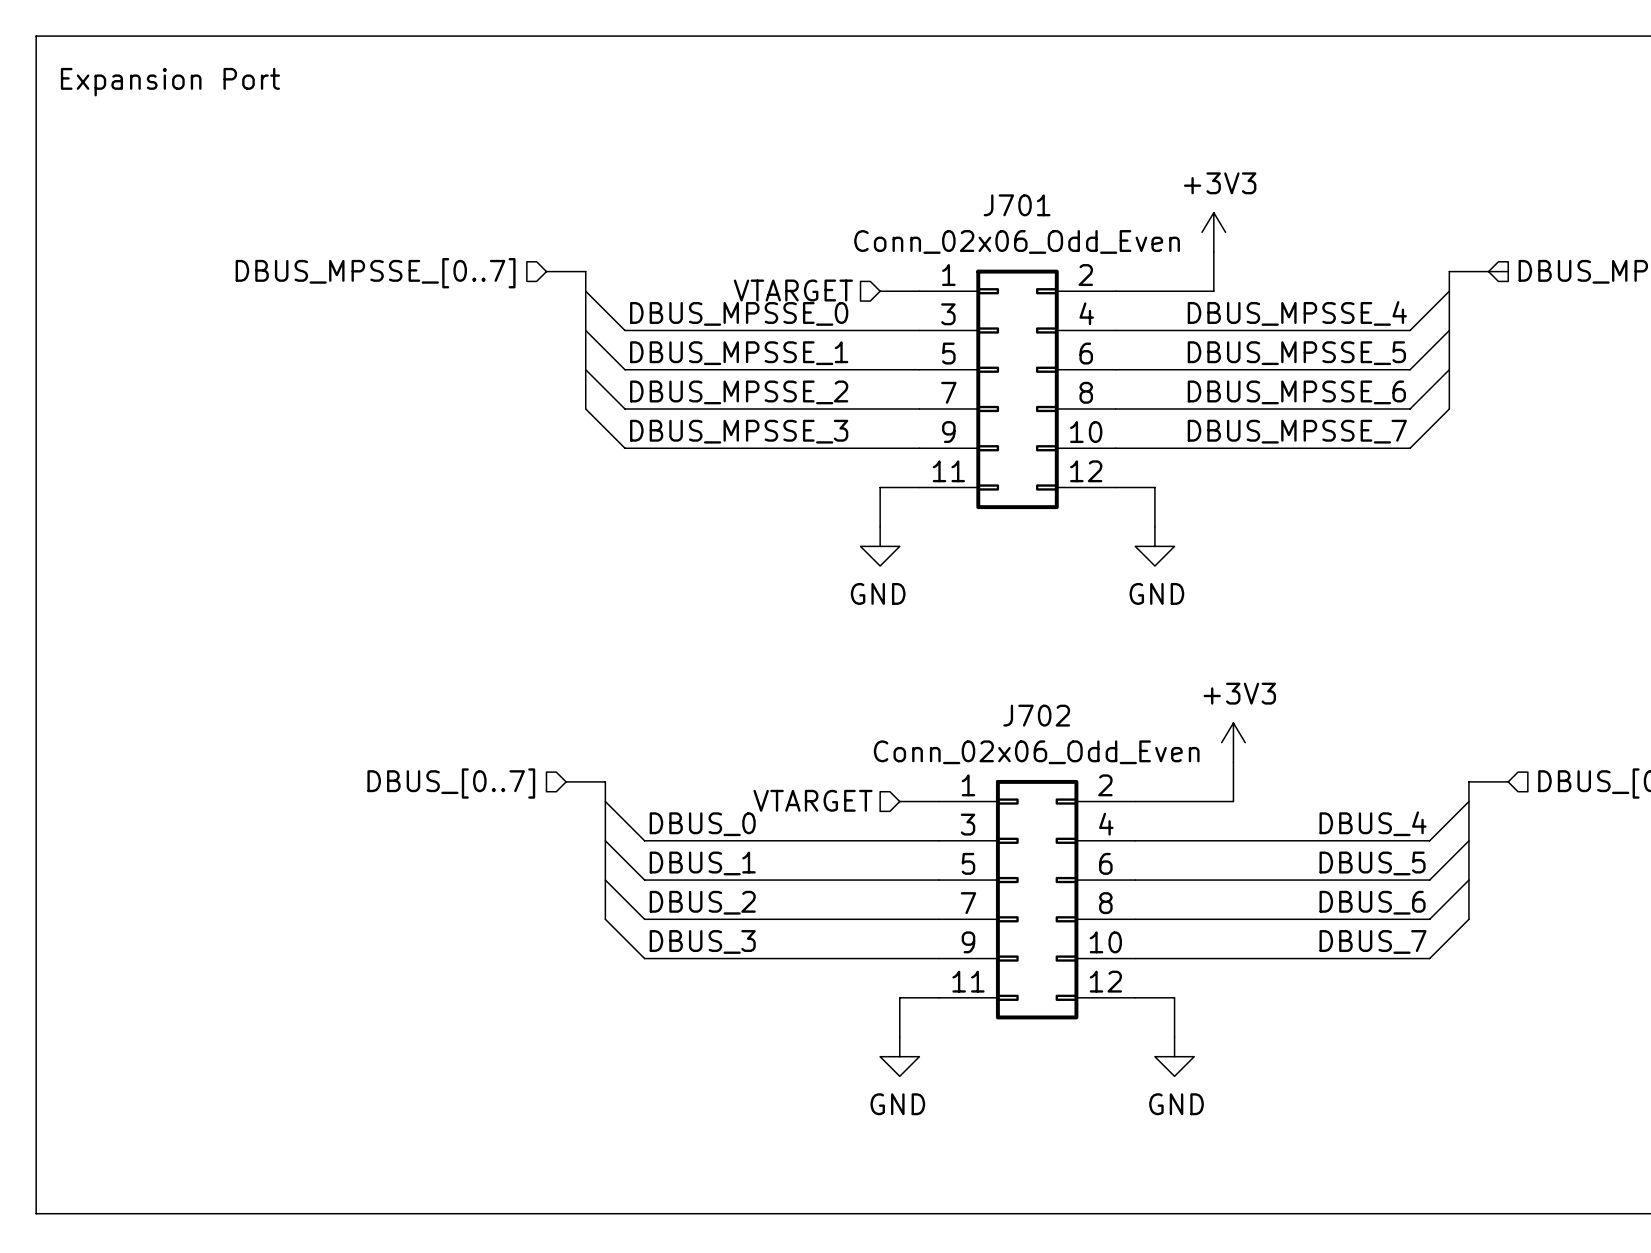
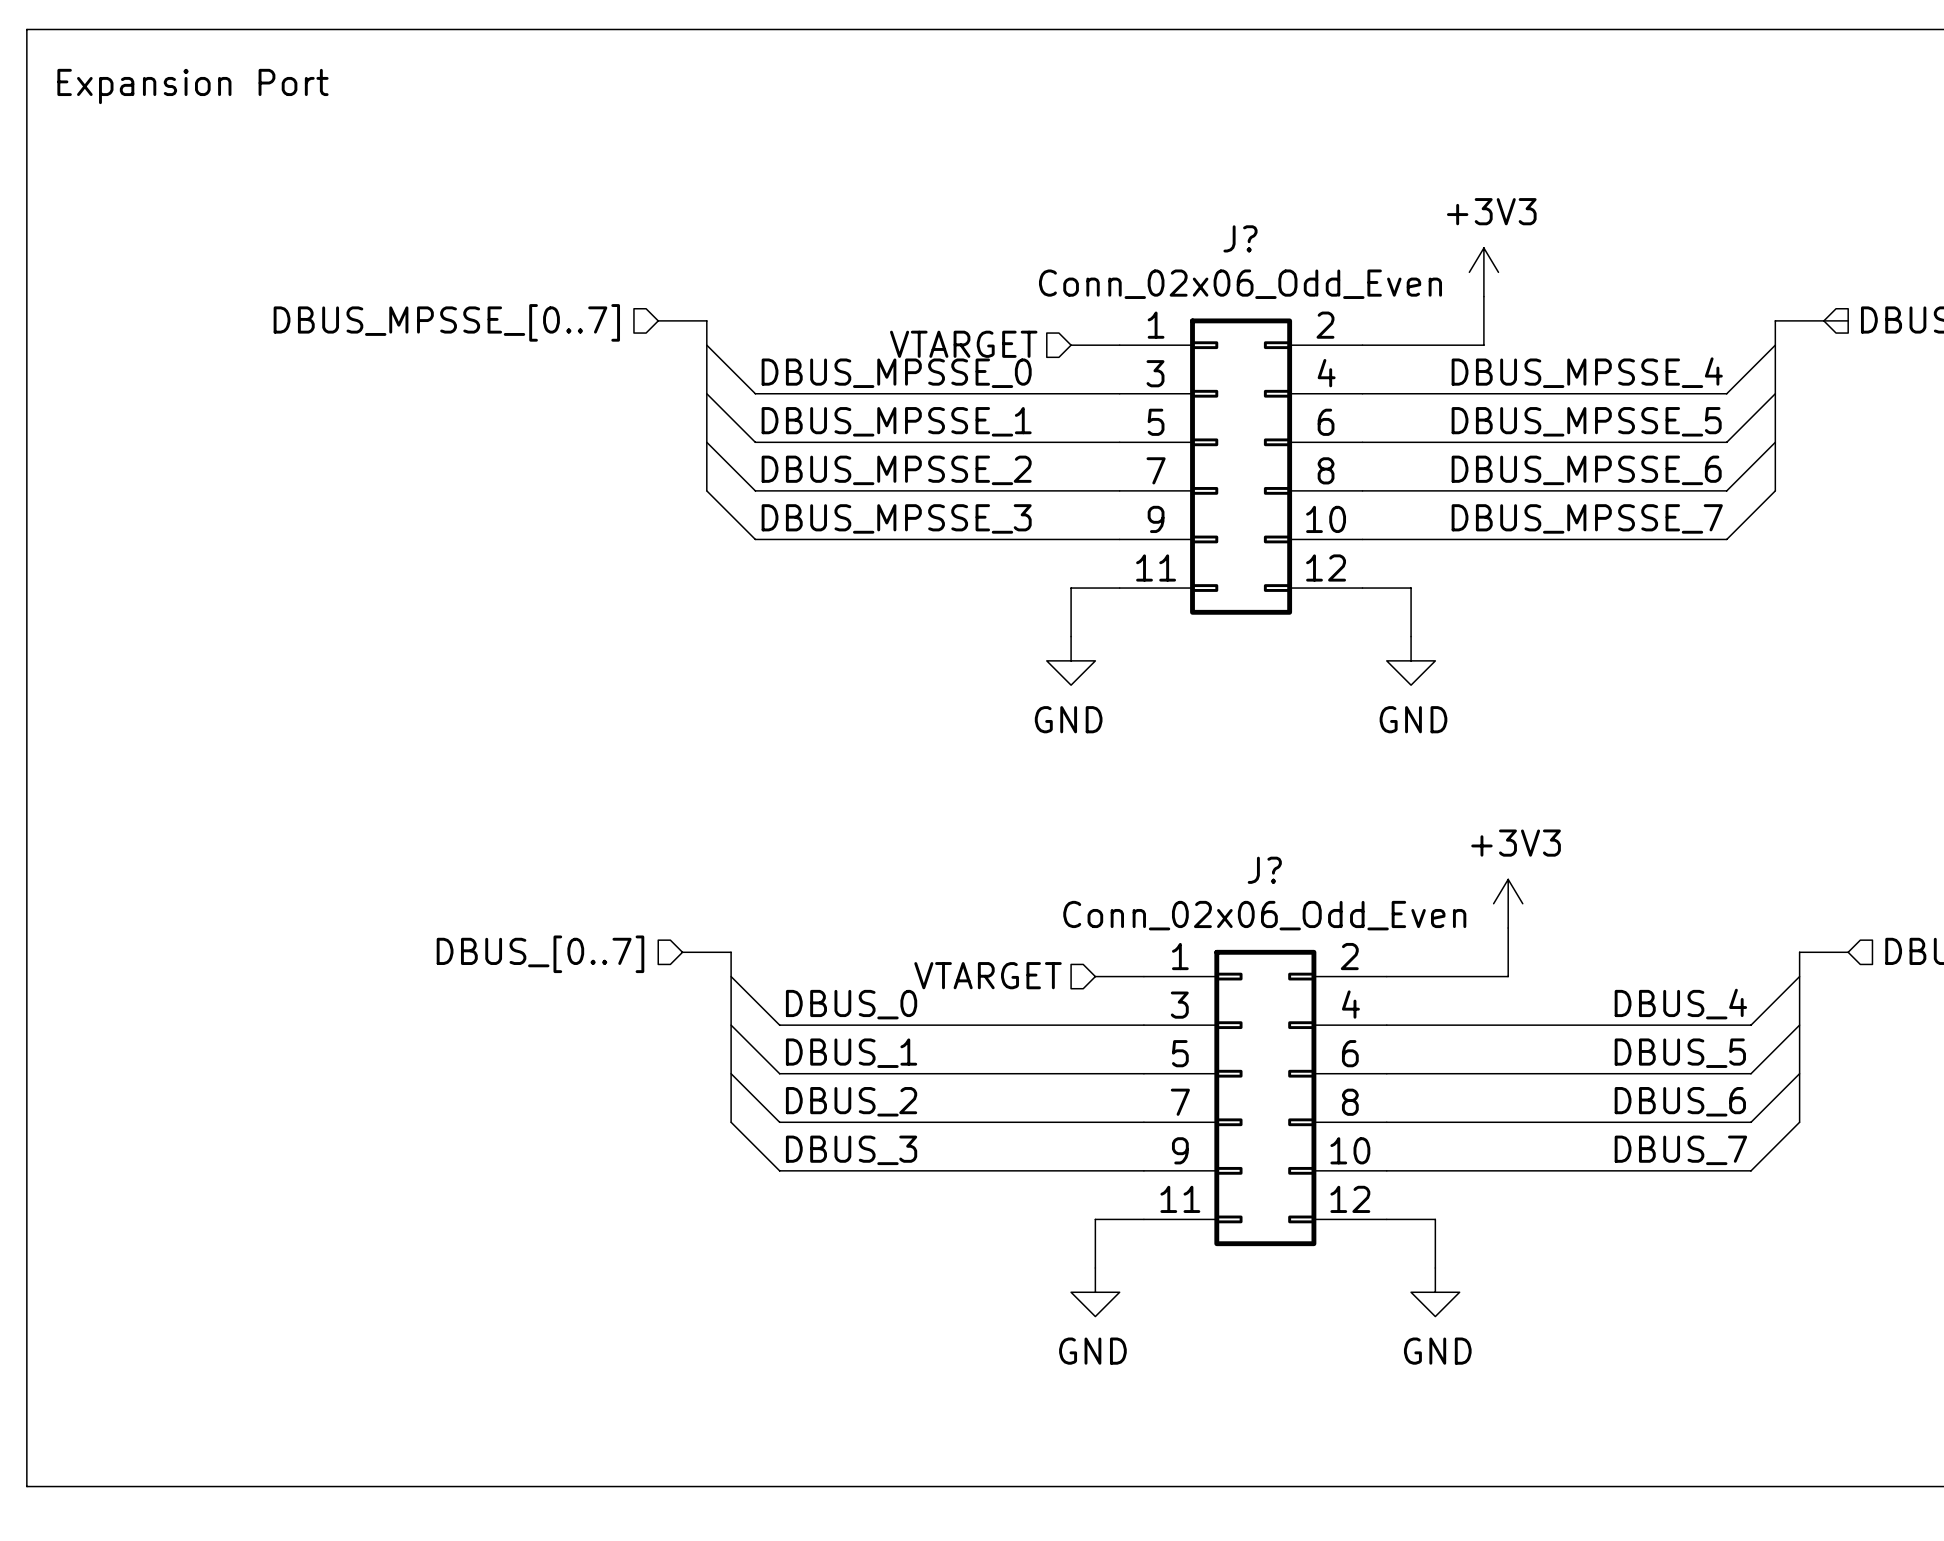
J701 name: J701 (1017, 205) -> J? (1240, 238)
J702 name: J702 (1036, 715) -> J? (1264, 870)

